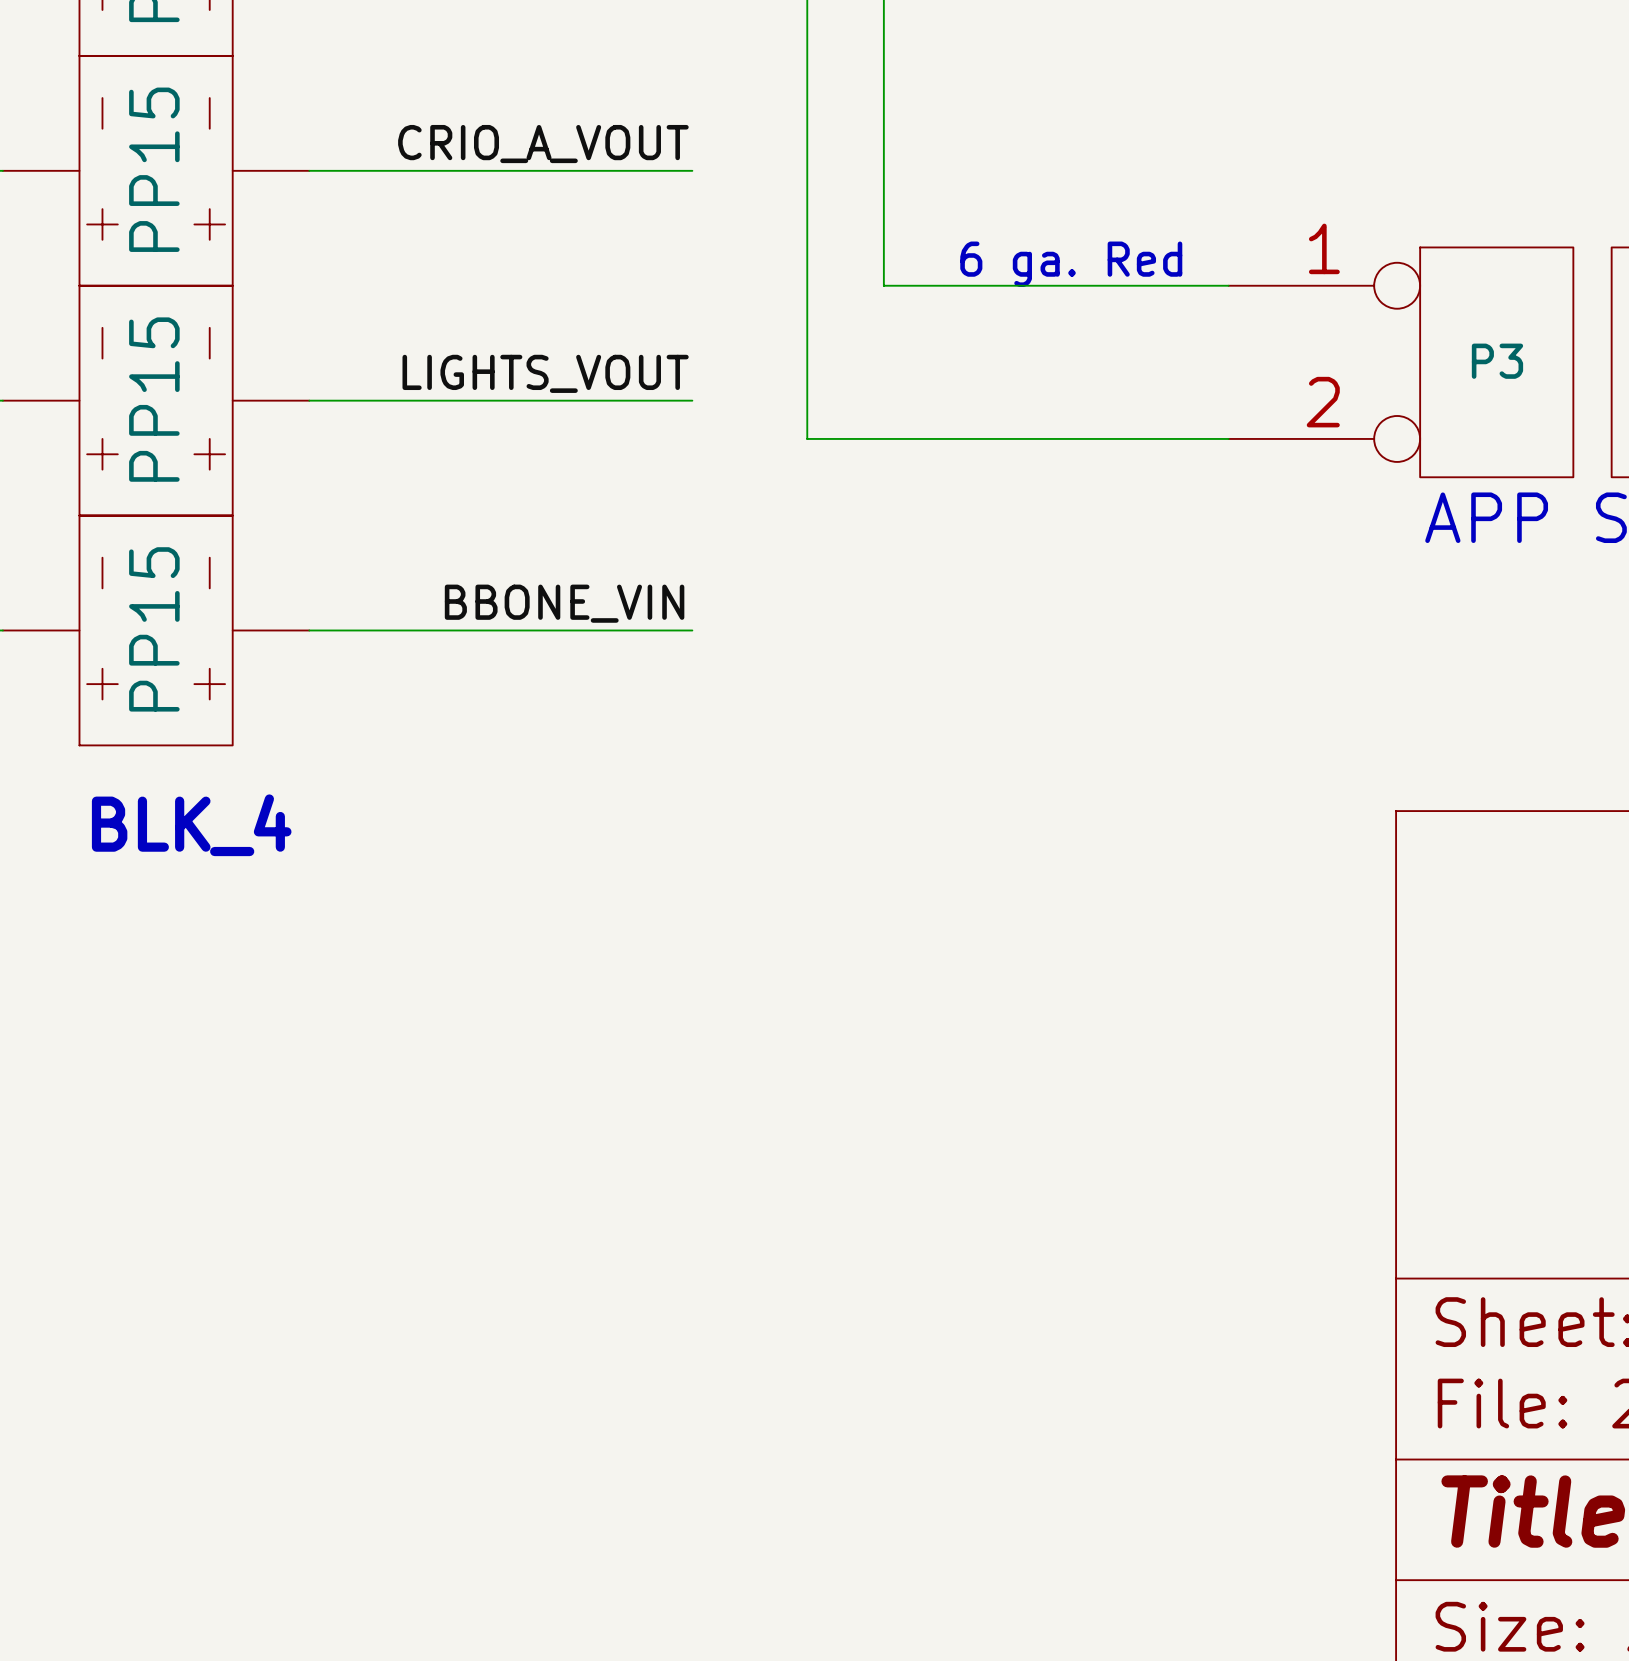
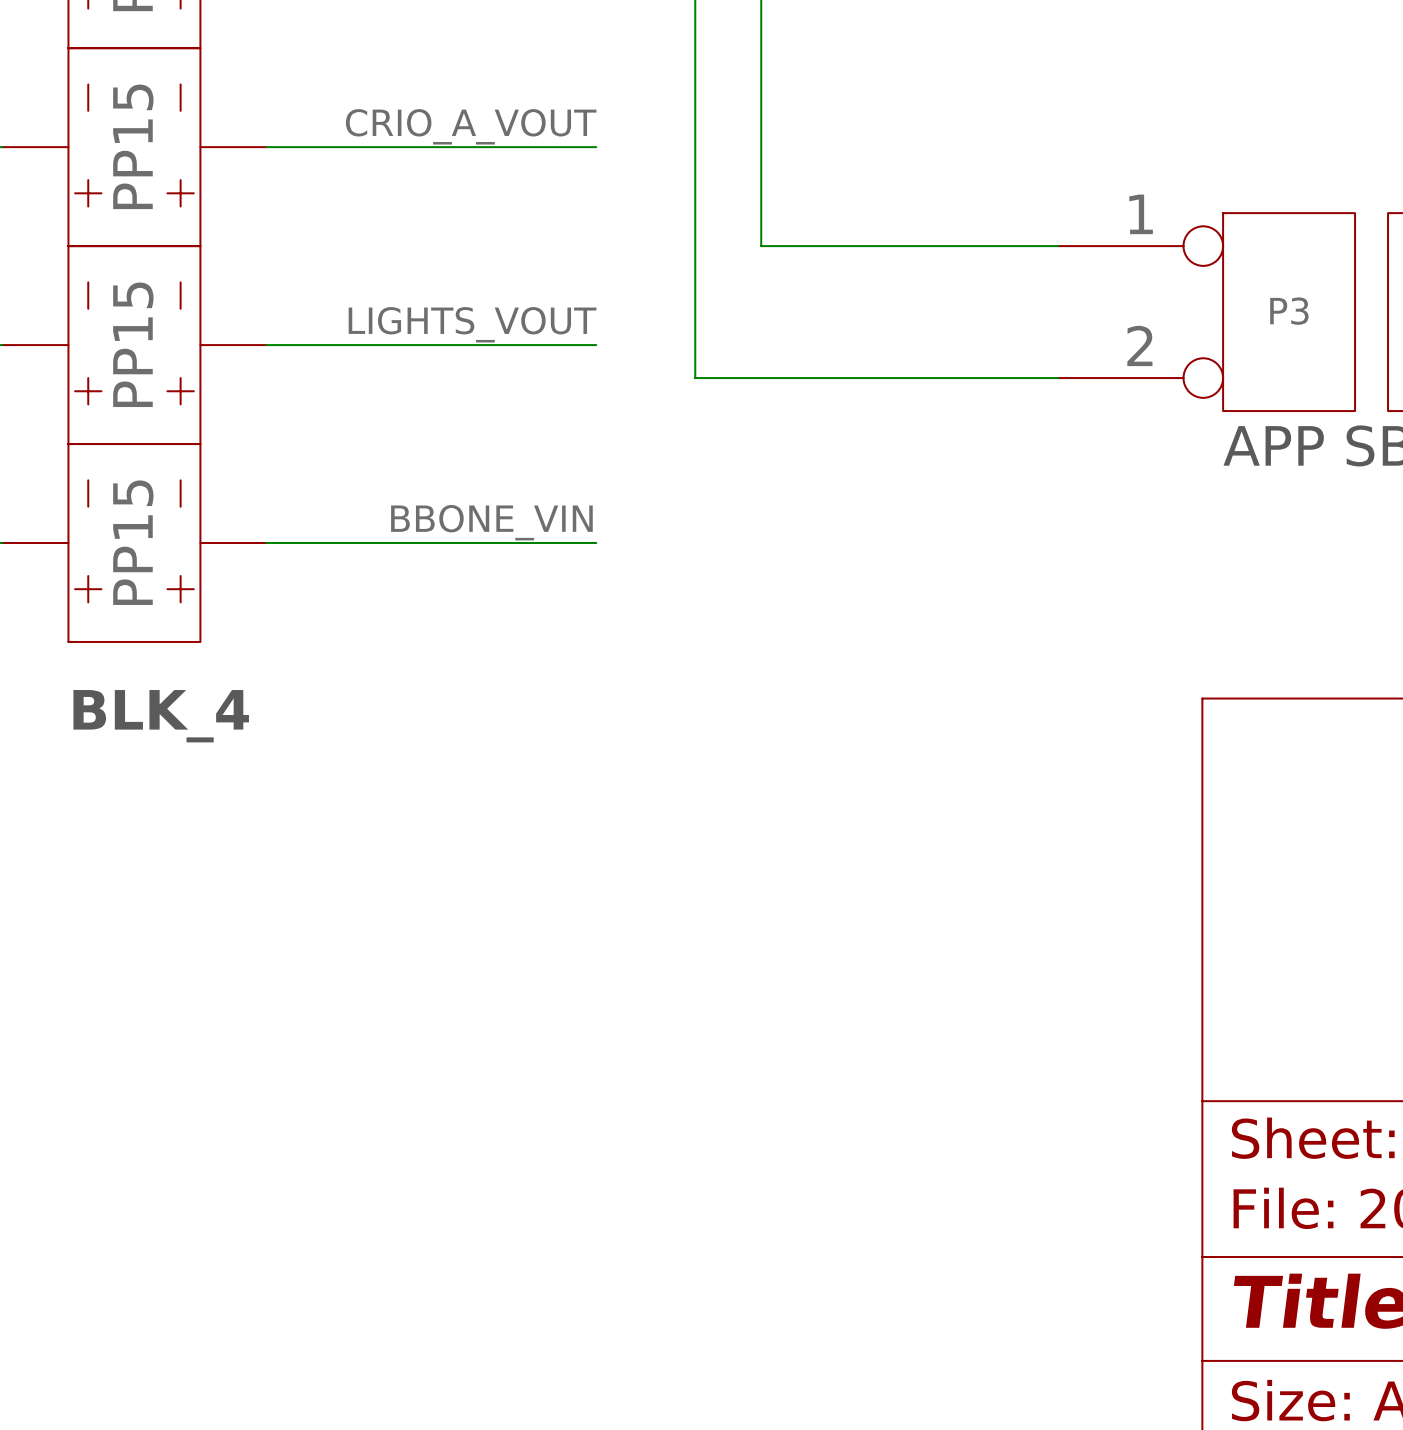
text: 6 ga. Red (1071, 264) -> none

